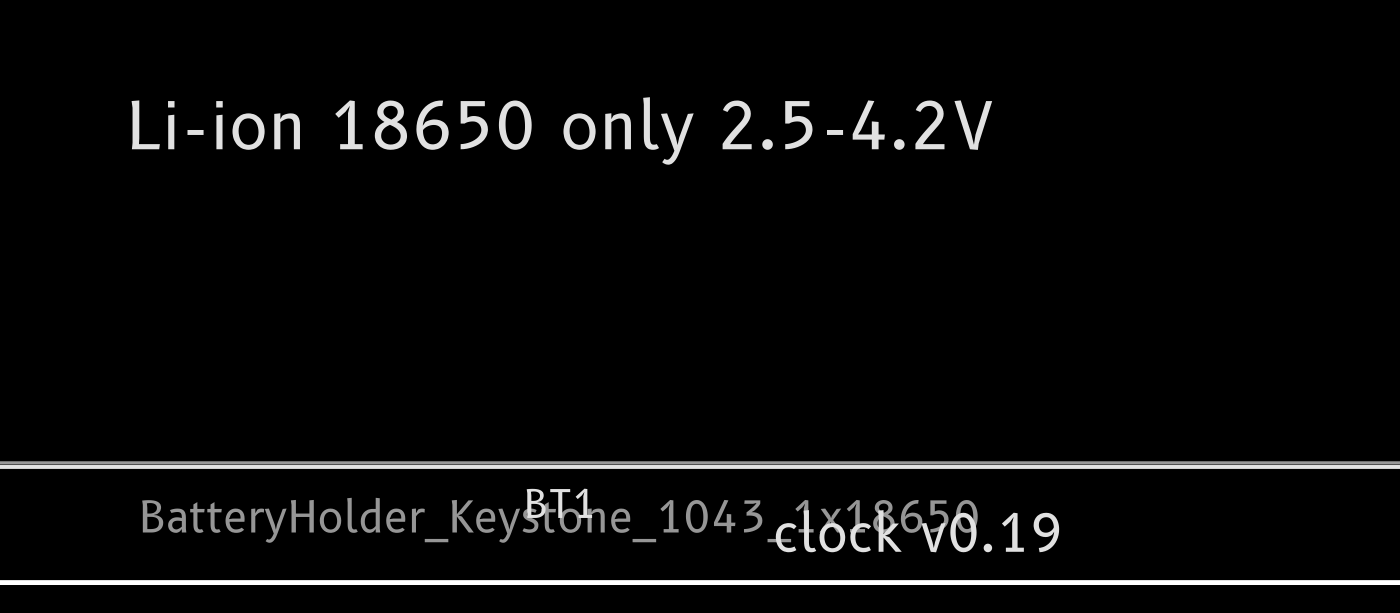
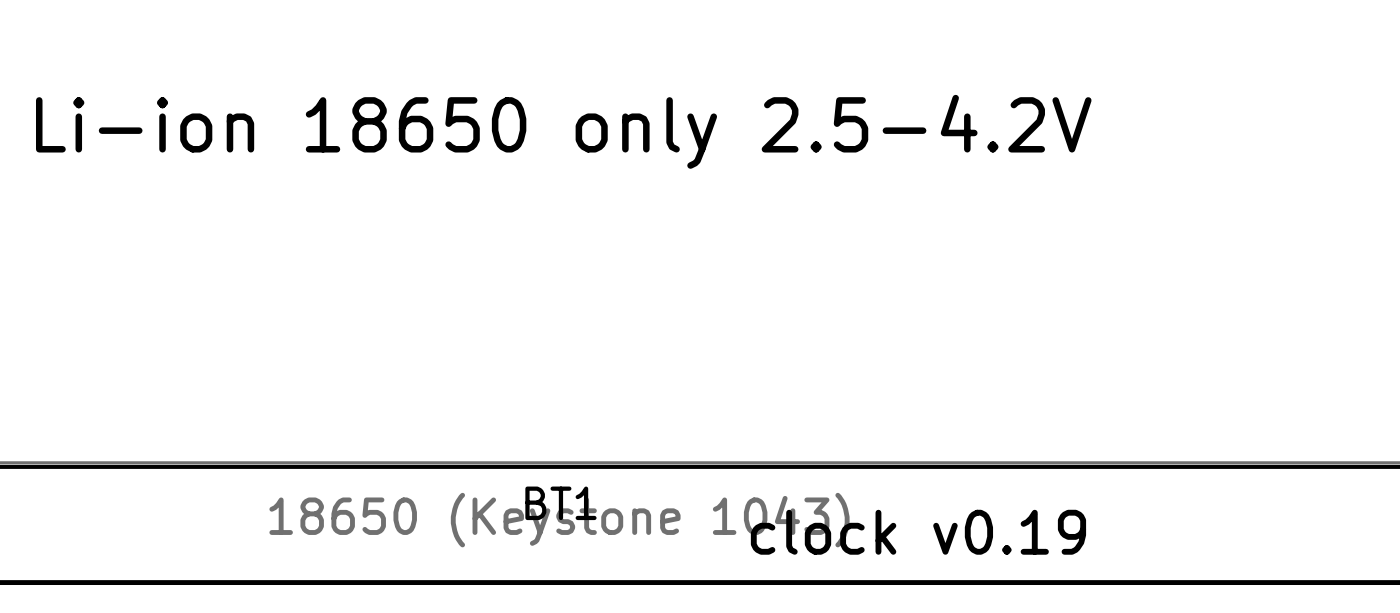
BT1 value: BatteryHolder_Keystone_1043_1x18650 (559, 520) -> 18650 (Keystone 1043) (559, 520)

